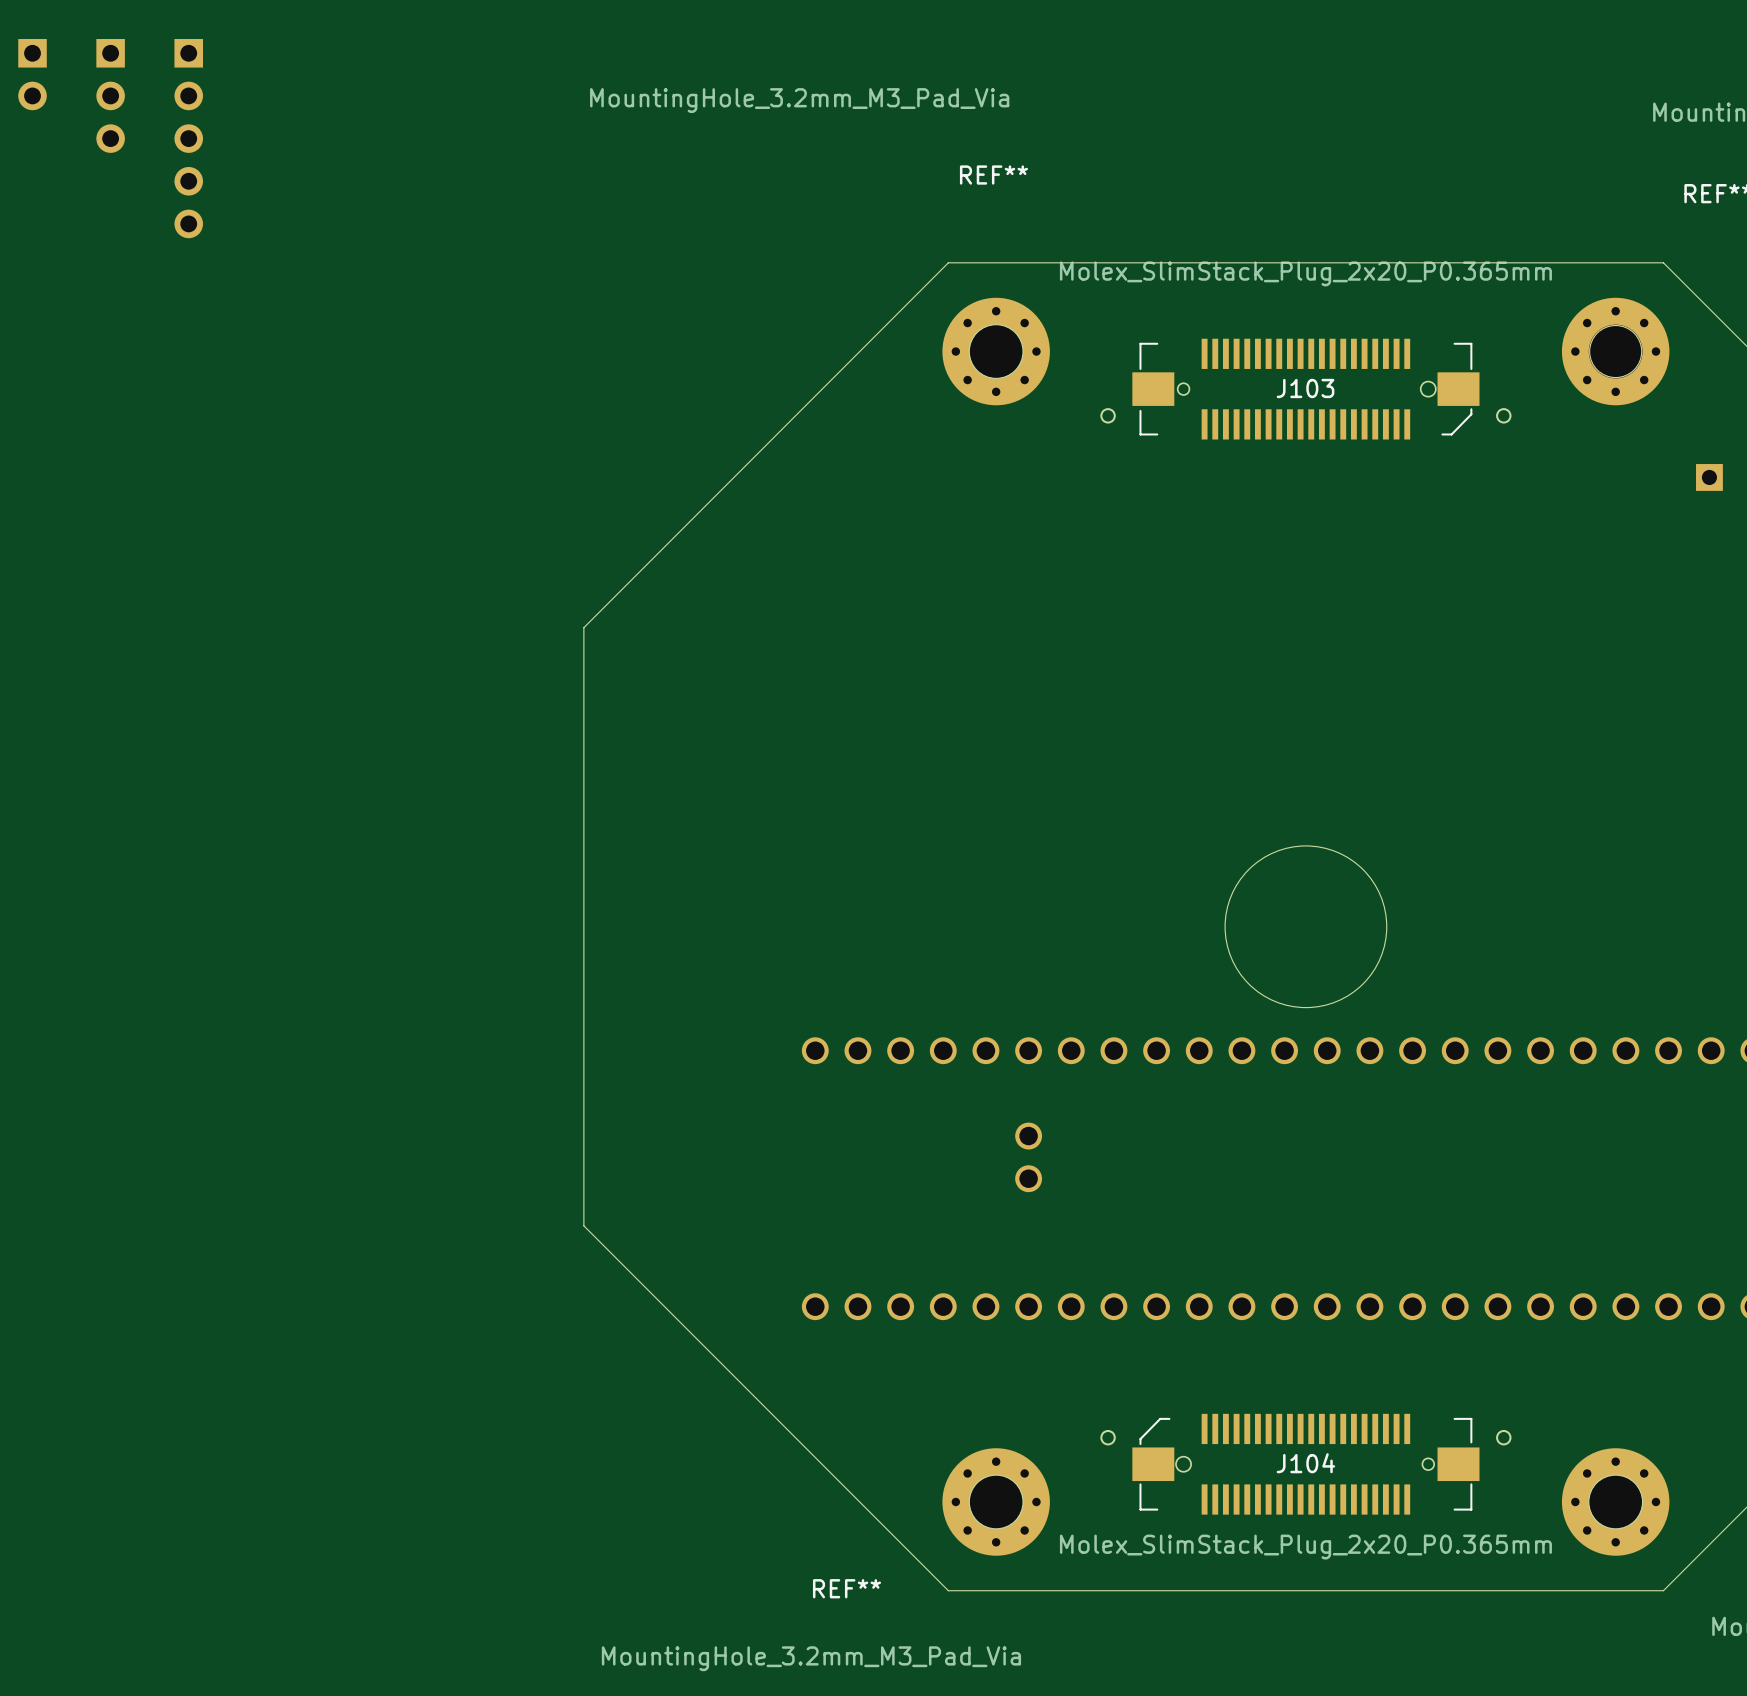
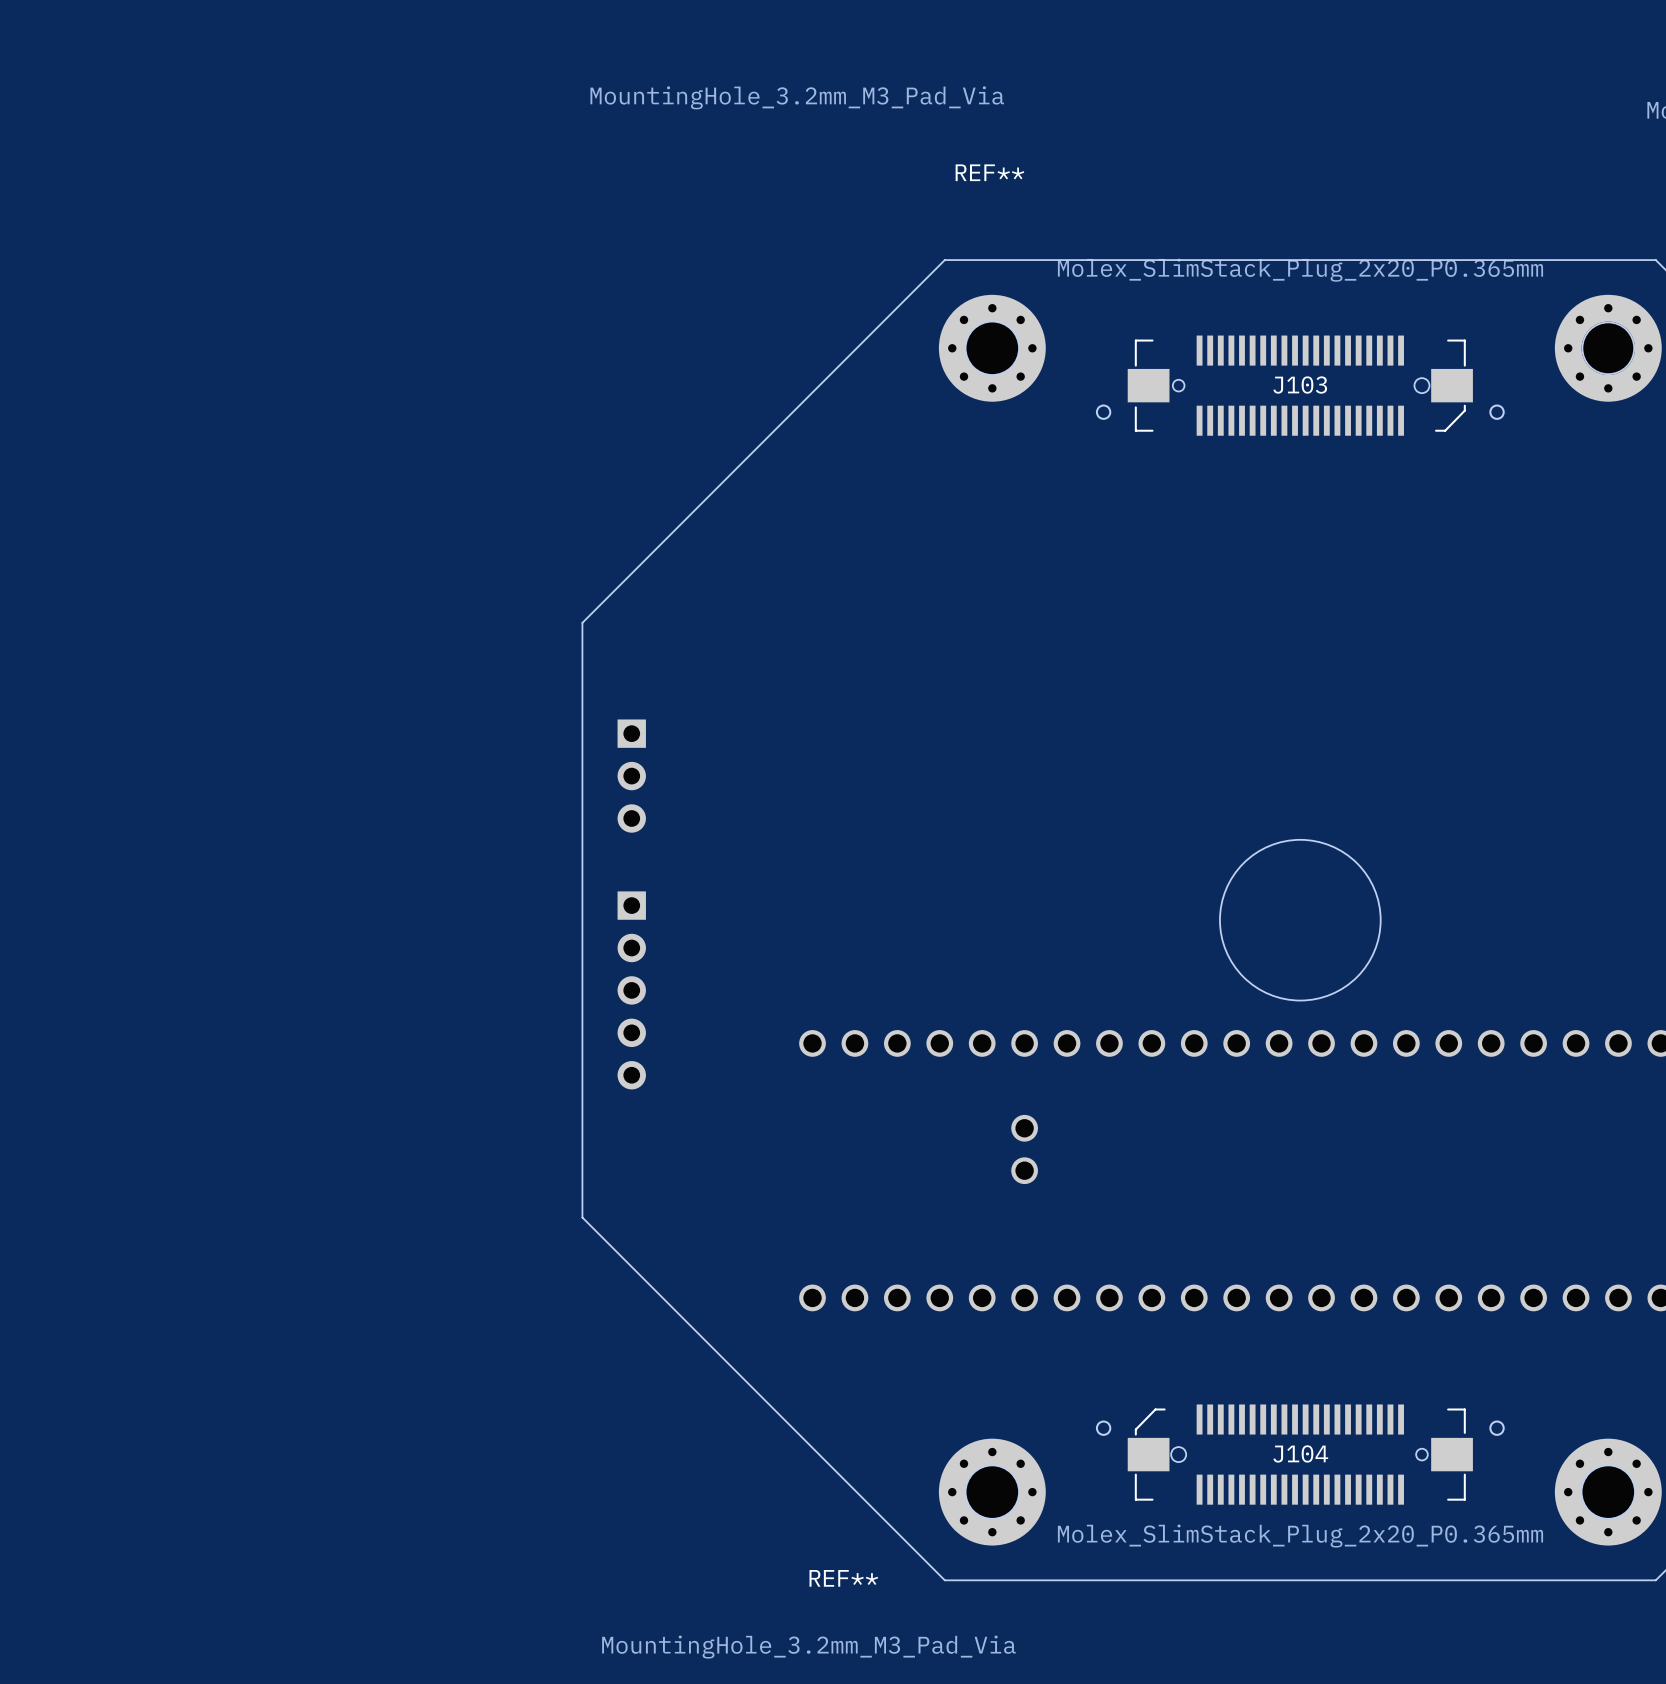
part: (32, 74) -> none
part: (110, 95) -> none
part: (188, 138) -> none
part: none -> (631, 776)
part: none -> (631, 990)

